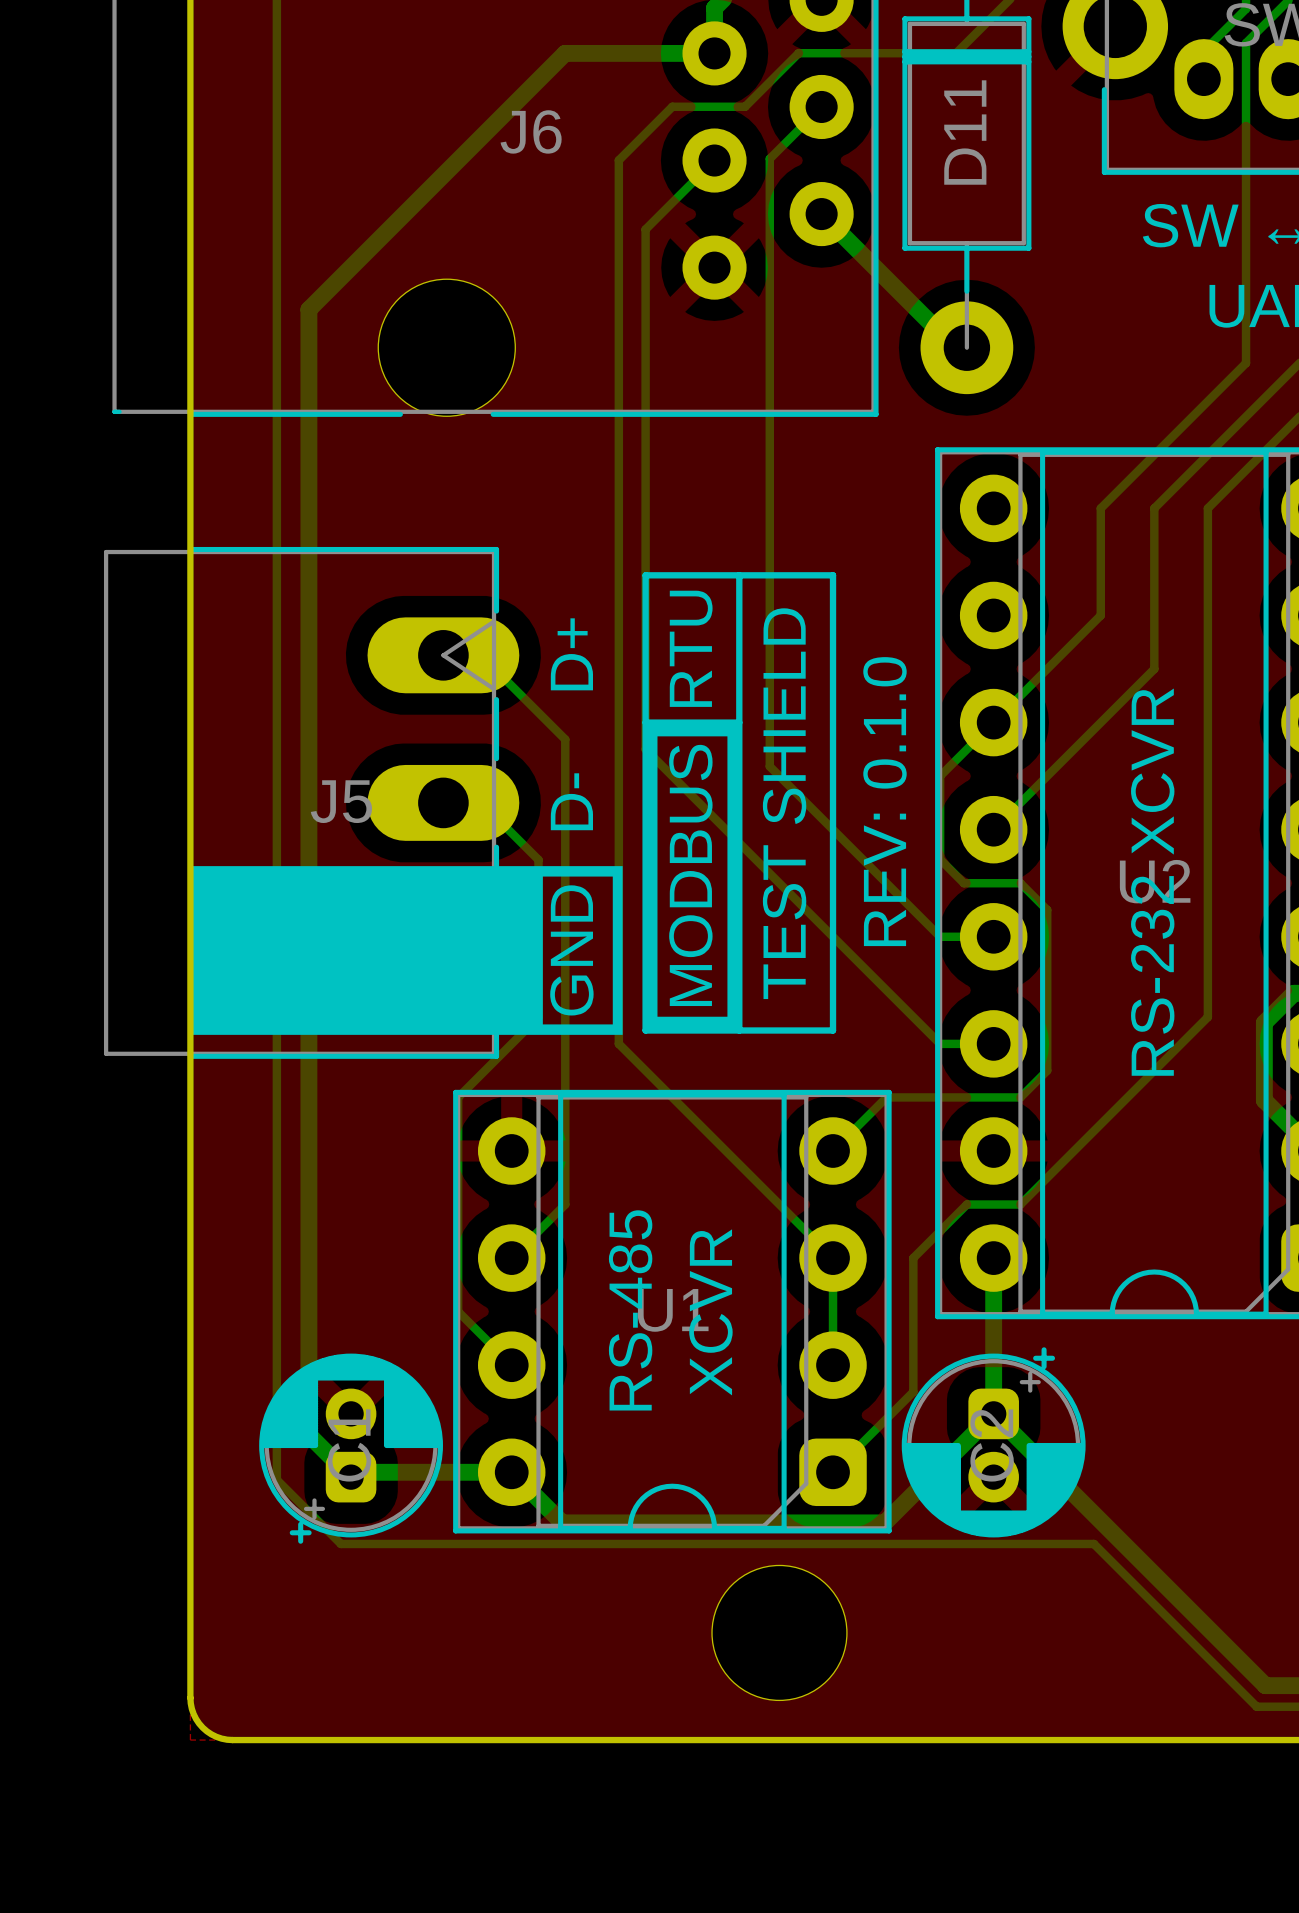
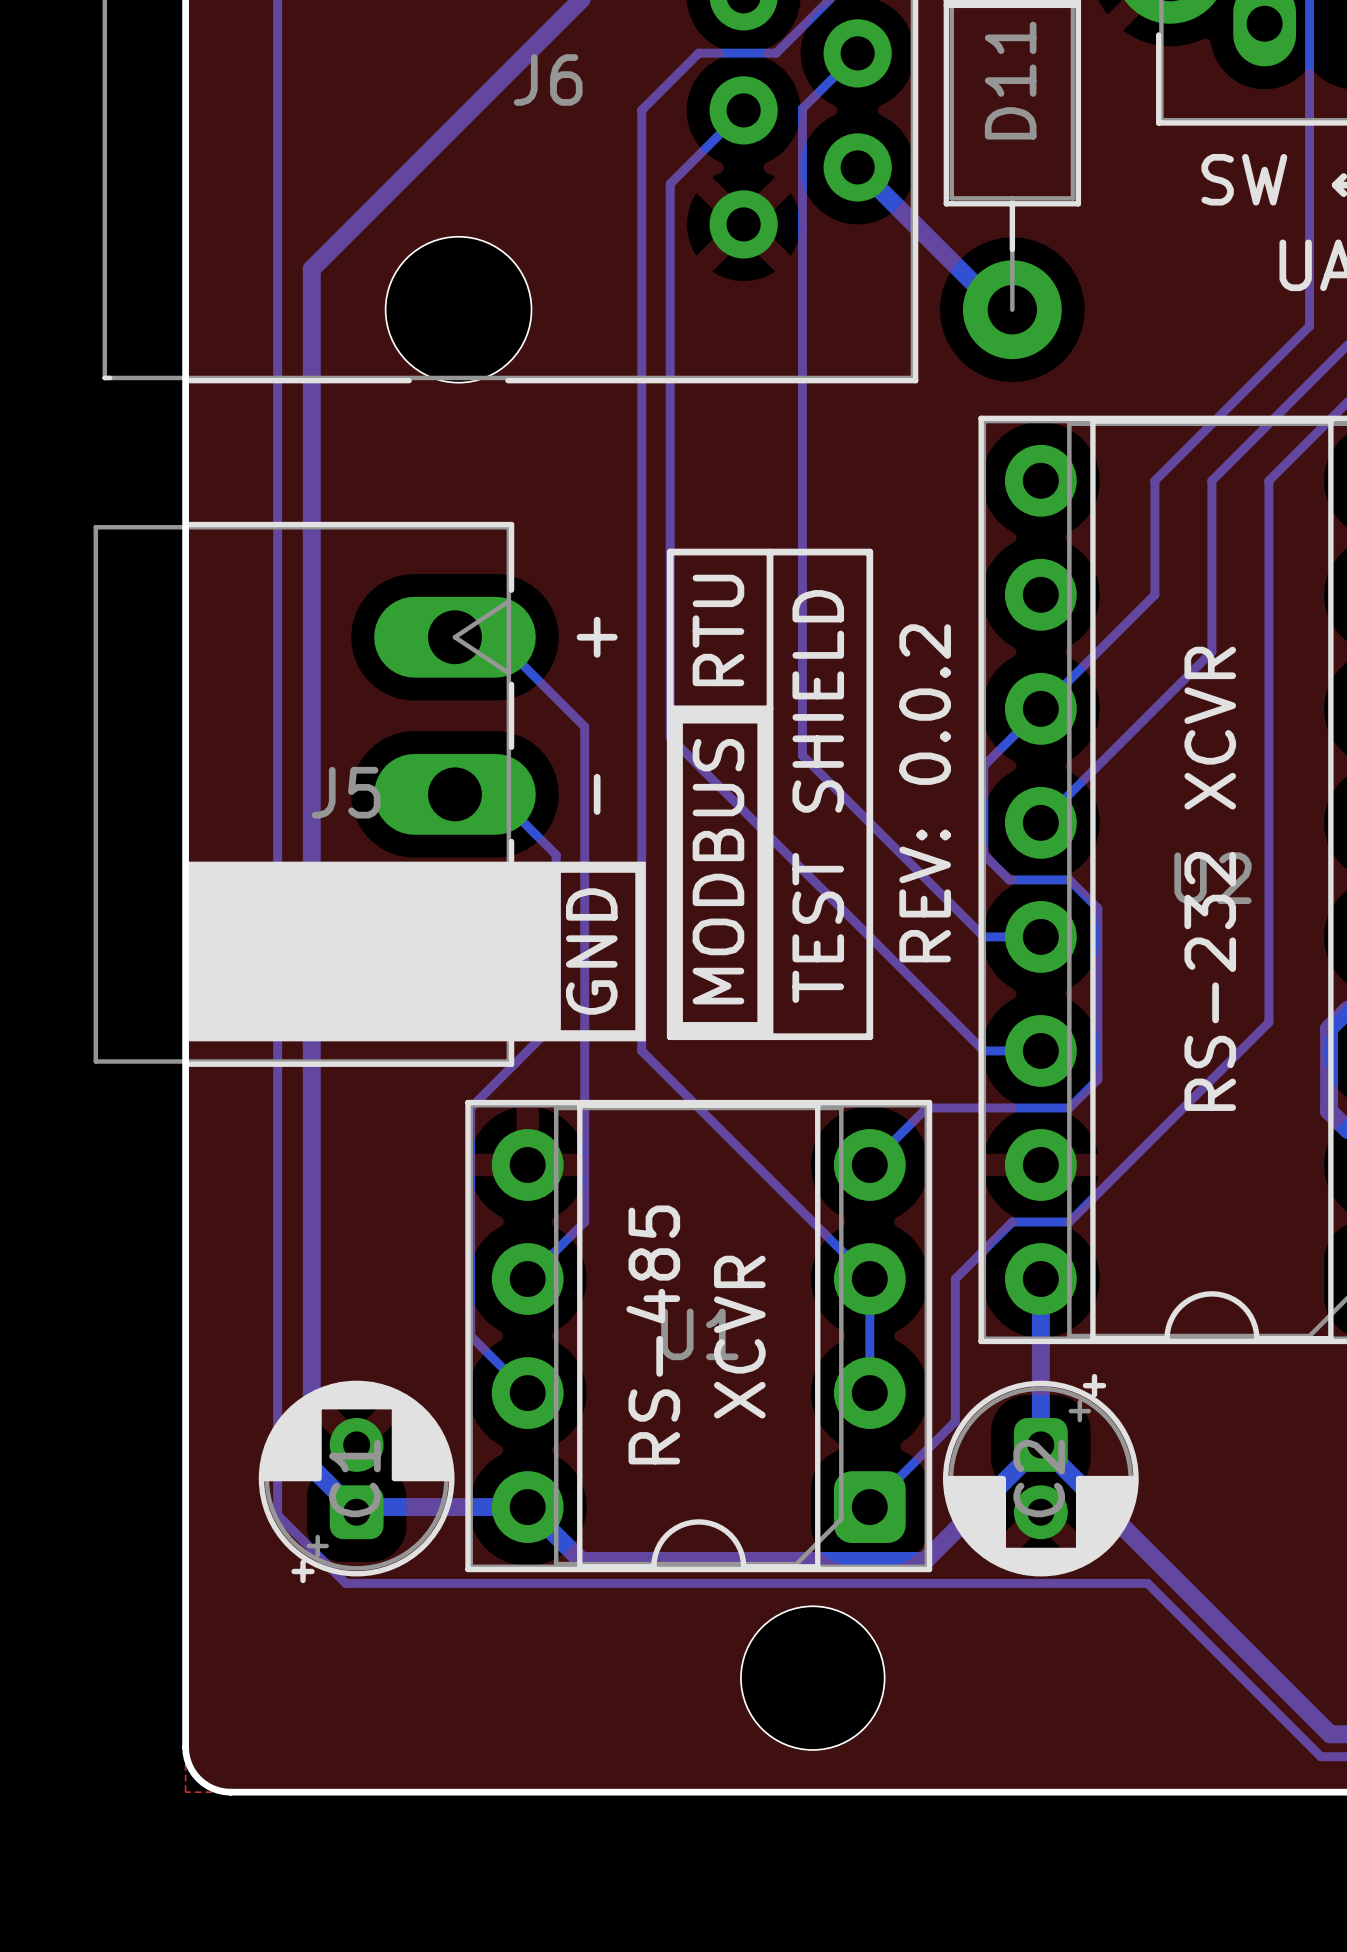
J5 text: D+ (571, 654) -> + (597, 637)
J5 text: D- (571, 801) -> - (597, 794)
text: REV: 0.1.0 (884, 801) -> REV: 0.0.2 (925, 793)

